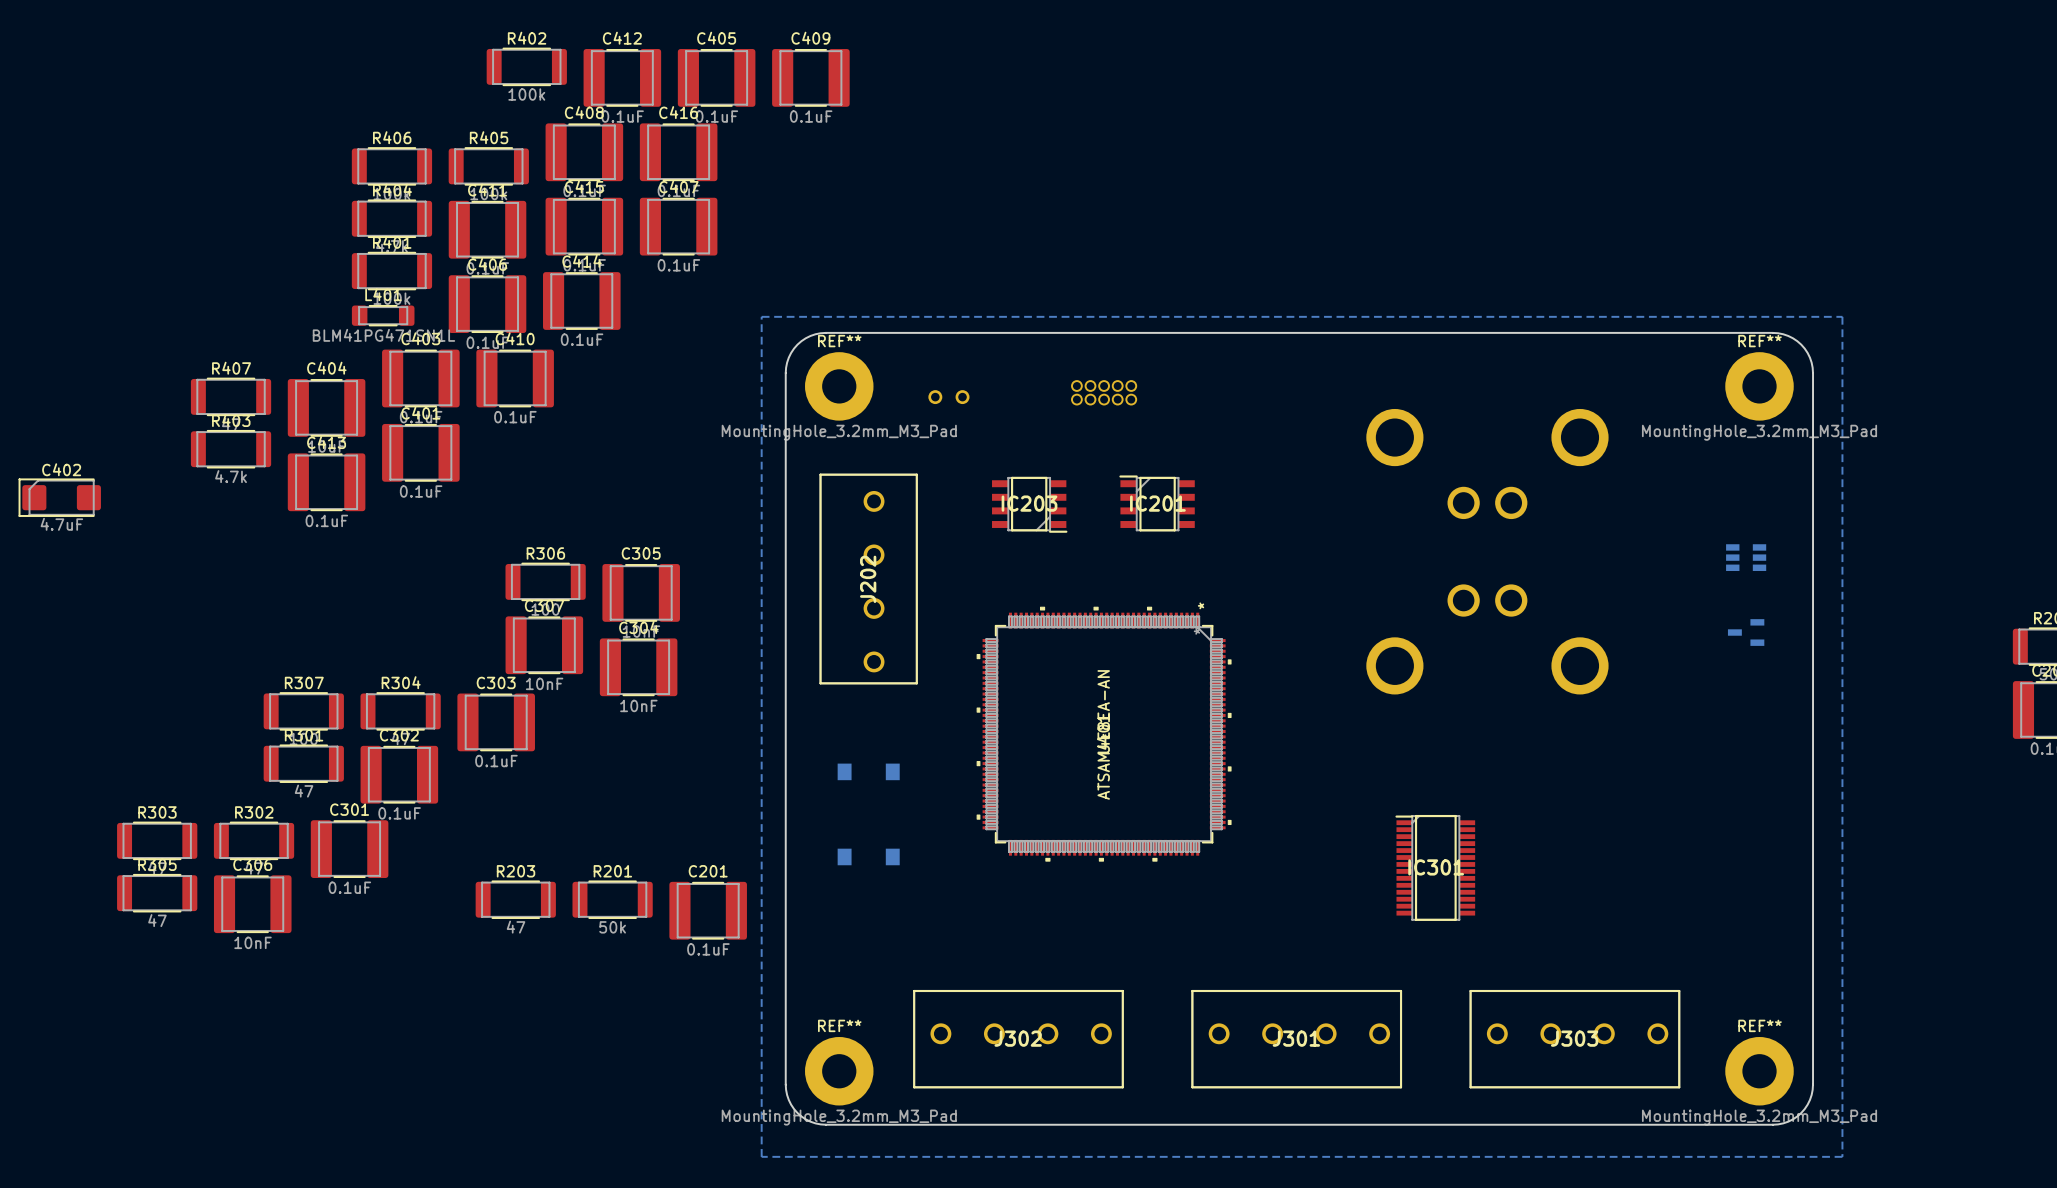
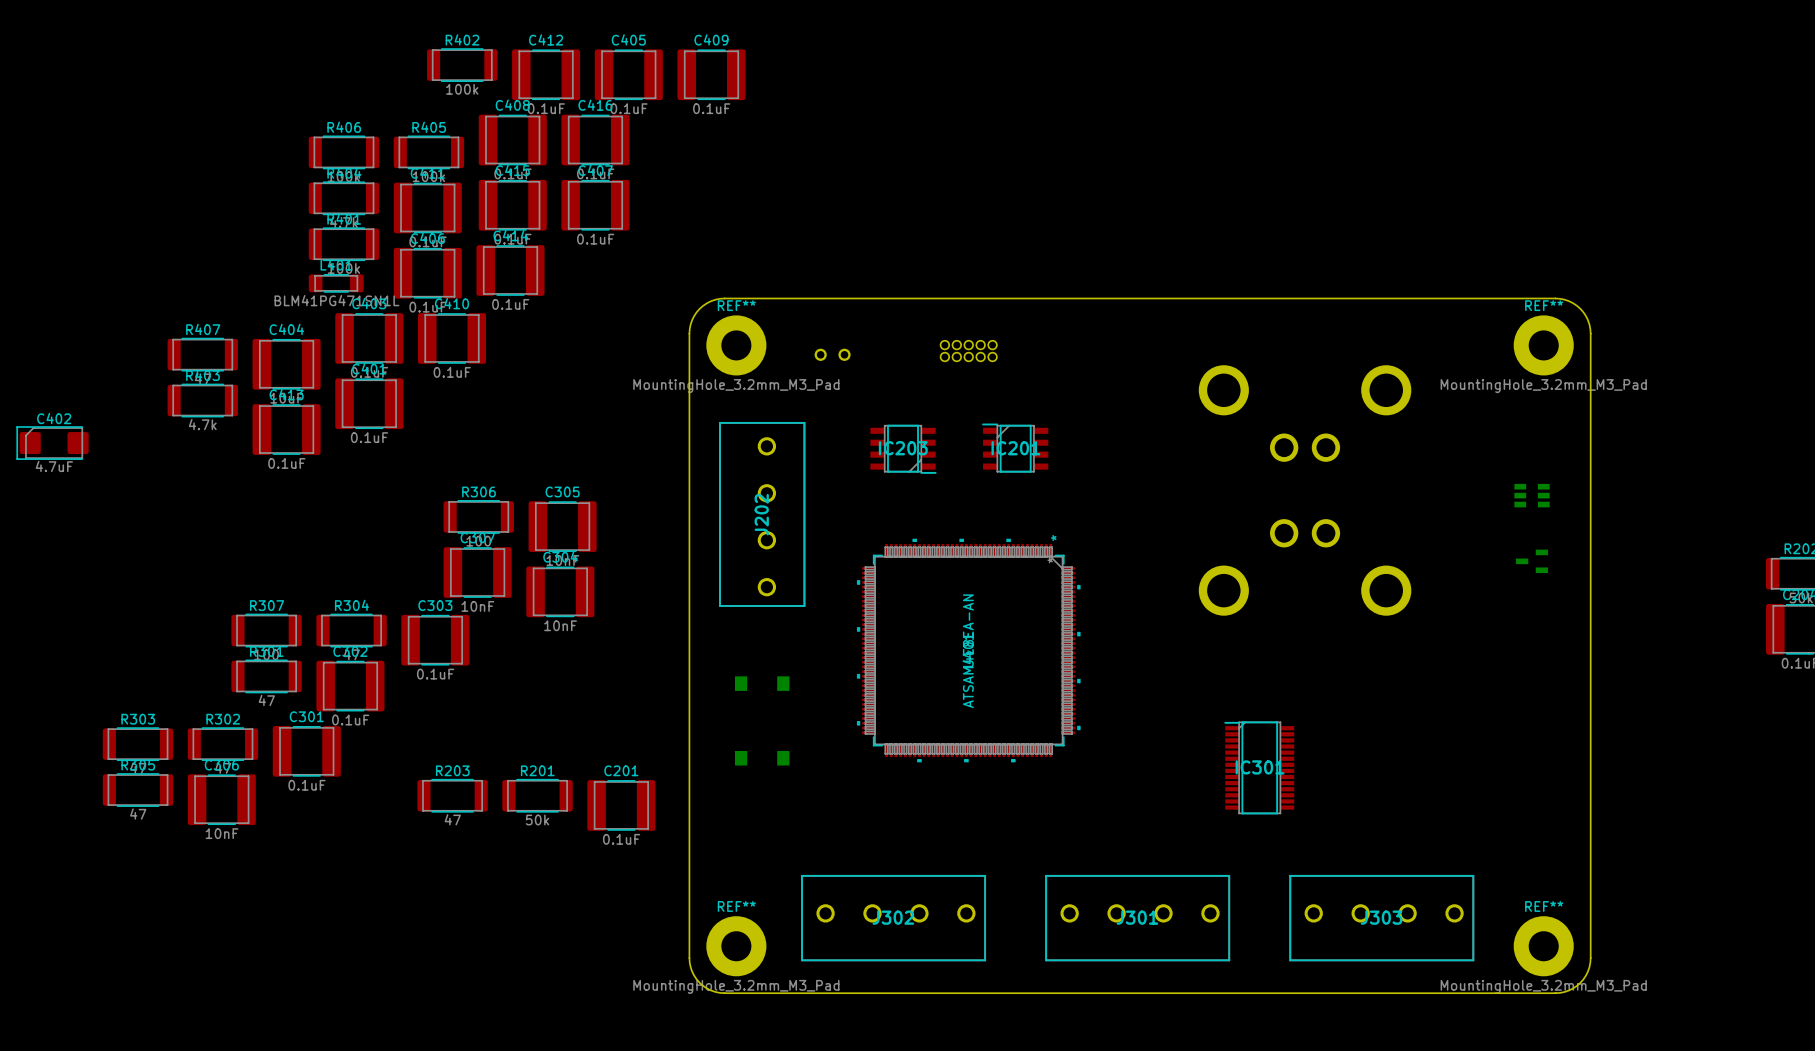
bottom zone outline: (761, 316) (761, 1156) (1842, 1156) (1842, 316) (761, 316) -> none

